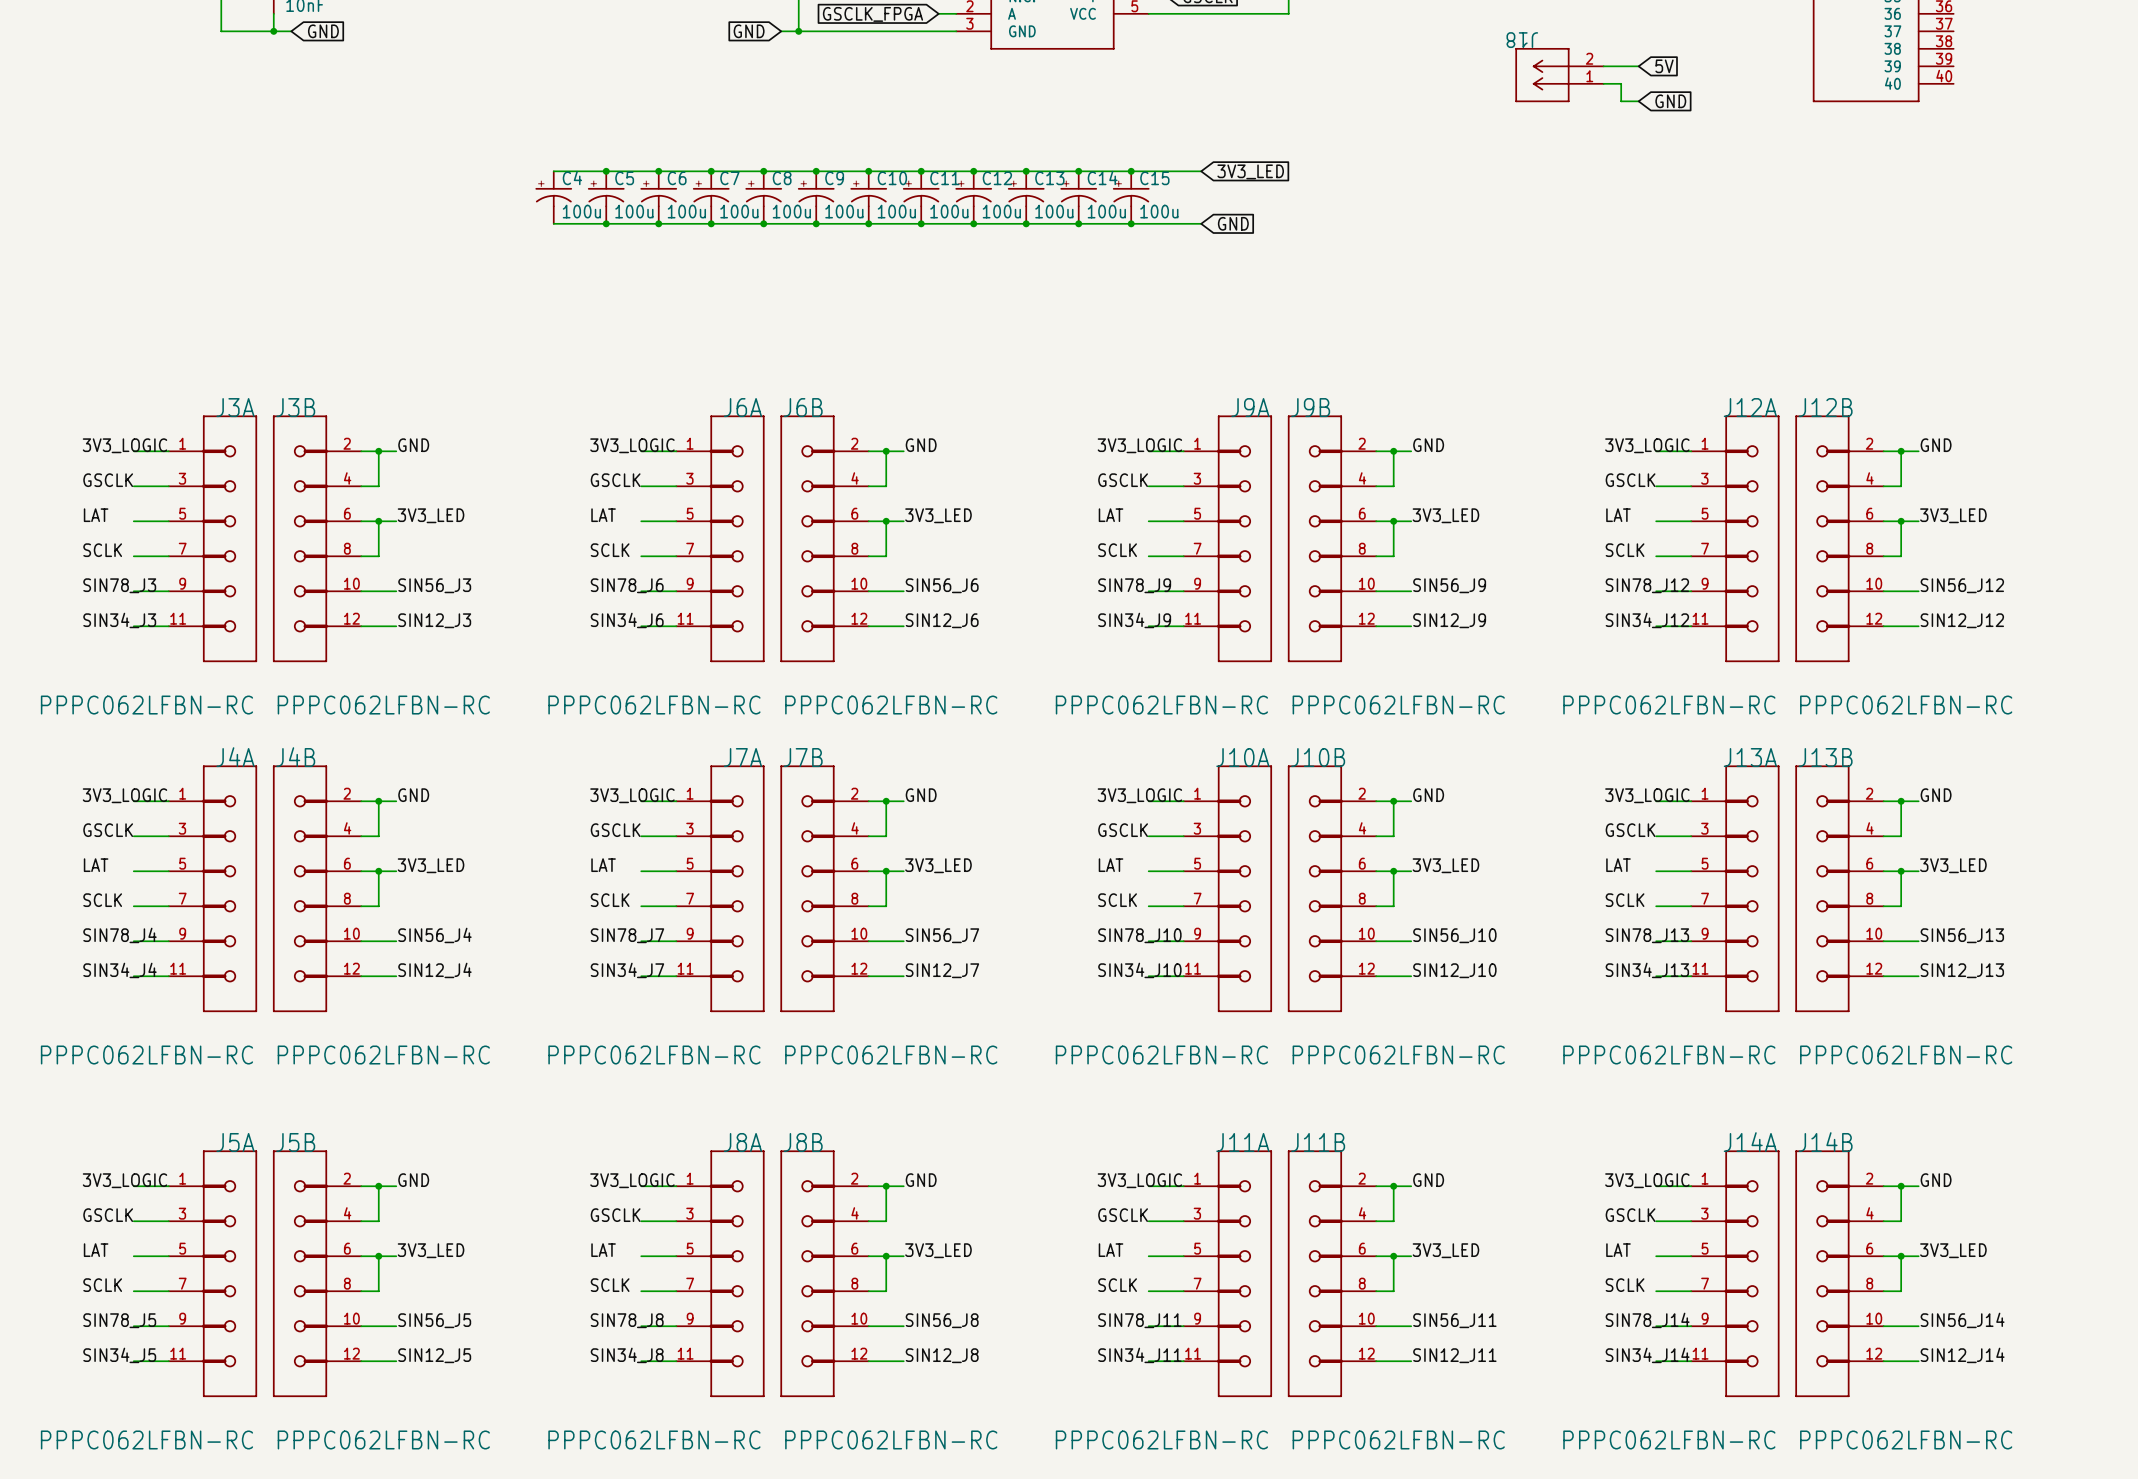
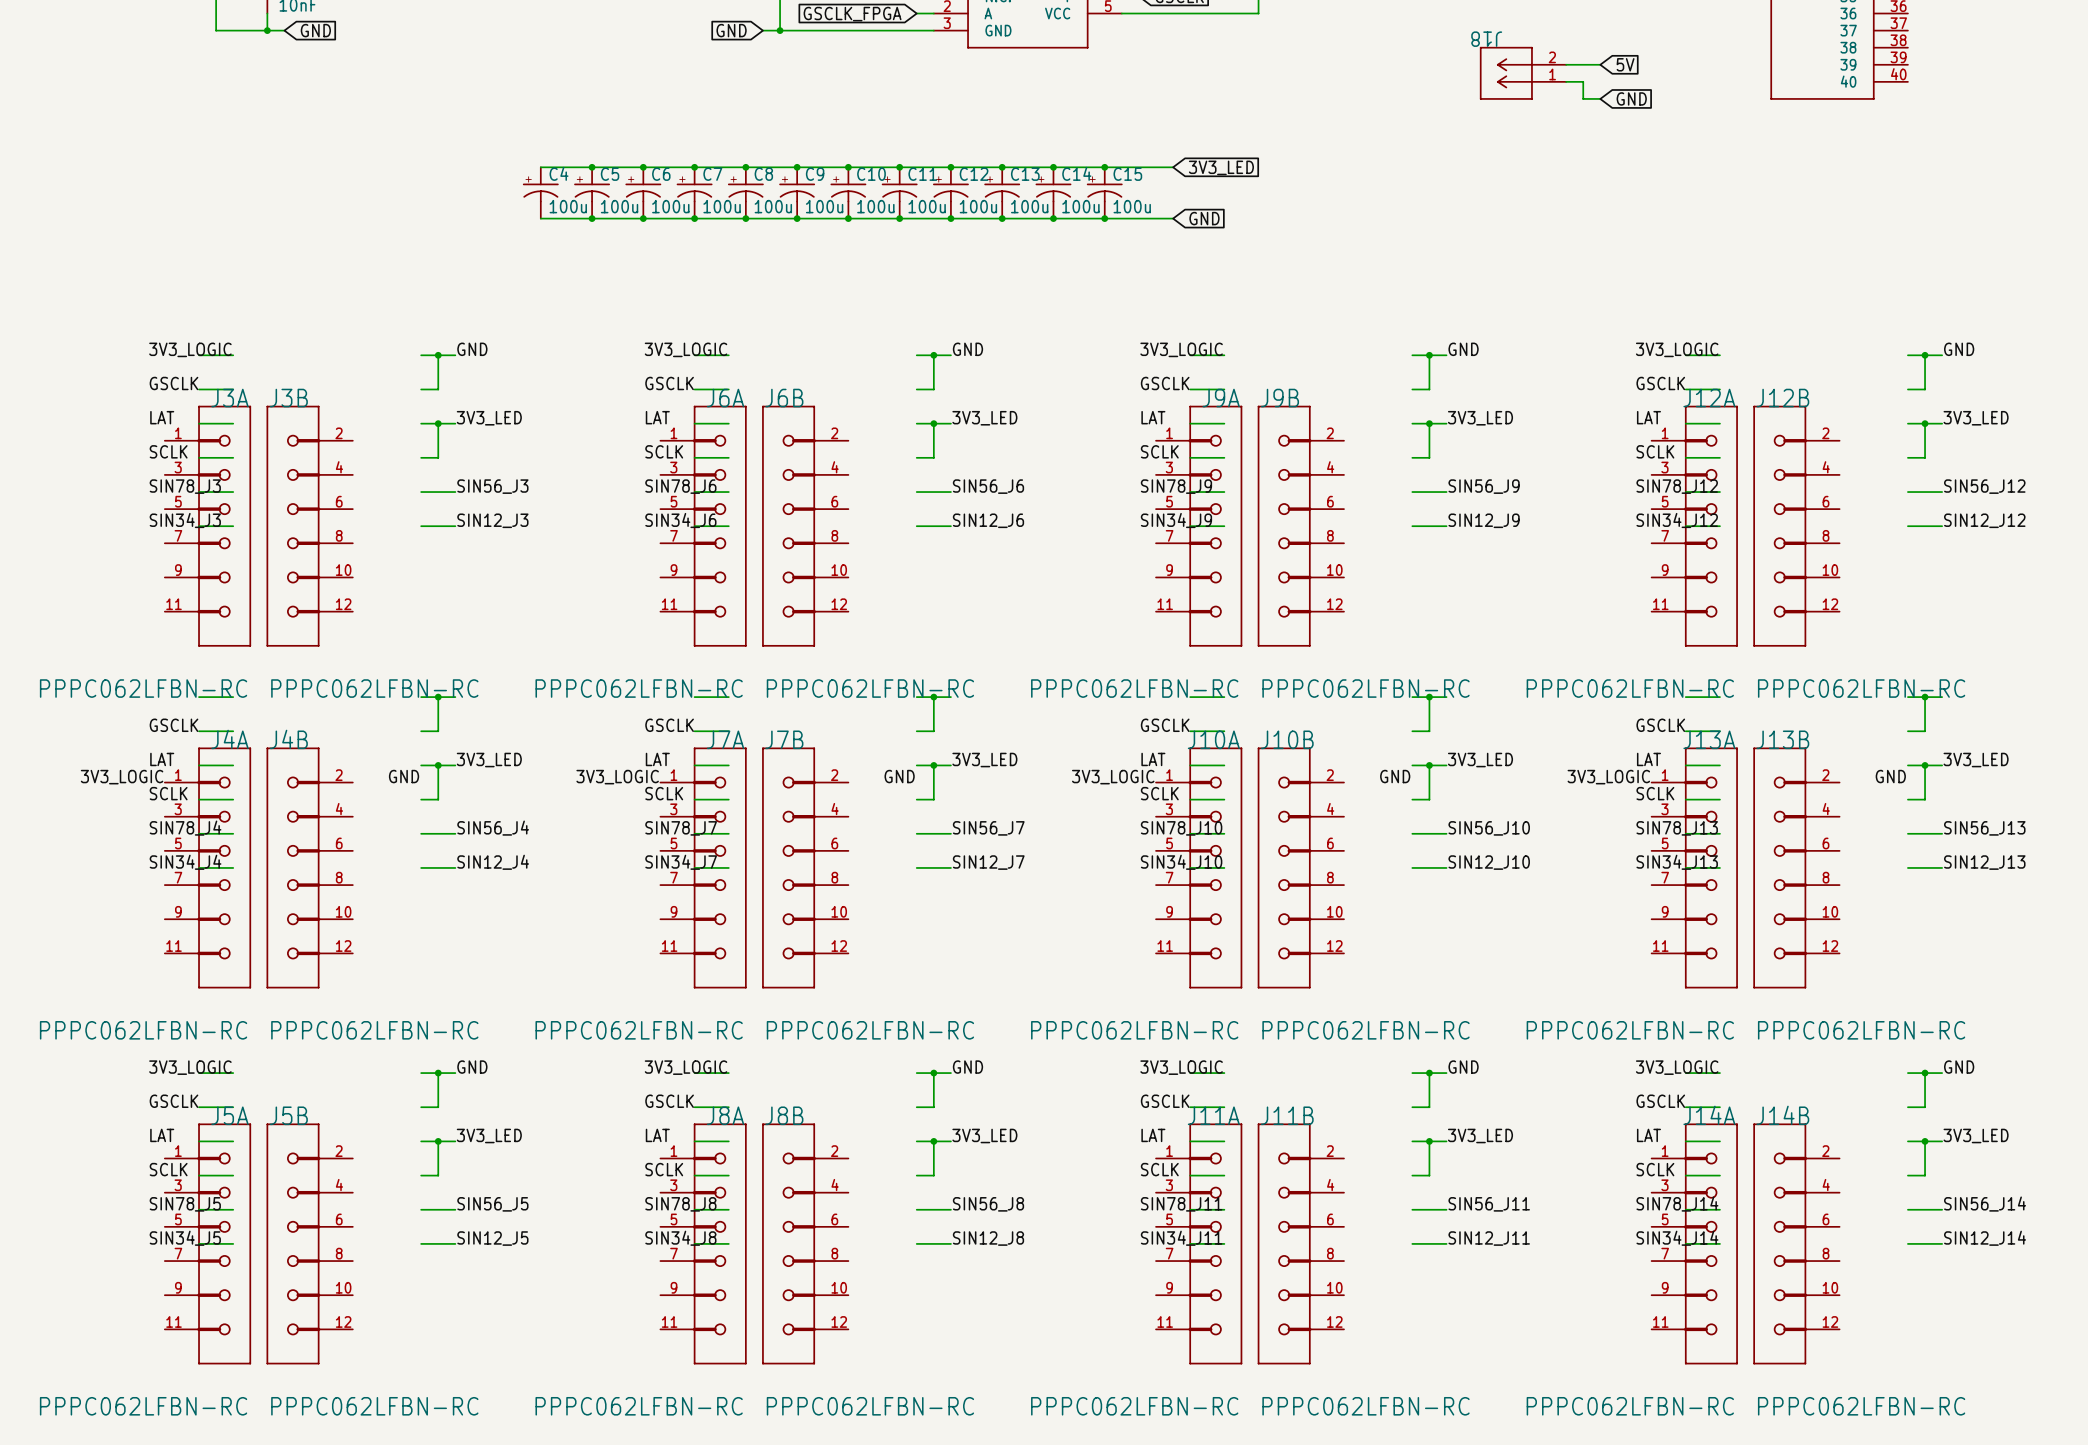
junction: none -> (438, 355)
junction: none -> (933, 355)
junction: none -> (1429, 355)
junction: none -> (1925, 355)
junction: none -> (438, 423)
junction: none -> (933, 423)
junction: none -> (1429, 423)
junction: none -> (1925, 423)
label position: 3V3_LOGIC (124, 445) -> 3V3_LOGIC (190, 349)
label position: GND (413, 445) -> GND (472, 349)
label position: 3V3_LOGIC (632, 445) -> 3V3_LOGIC (686, 349)
label position: GND (921, 445) -> GND (967, 349)
label position: 3V3_LOGIC (1139, 445) -> 3V3_LOGIC (1181, 349)
label position: GND (1428, 445) -> GND (1463, 349)
label position: 3V3_LOGIC (1647, 445) -> 3V3_LOGIC (1677, 349)
label position: GND (1936, 445) -> GND (1959, 349)
wire: (133, 451) (168, 451) -> (199, 355) (233, 355)
wire: (361, 451) (396, 451) -> (421, 355) (455, 355)
wire: (378, 451) (378, 486) (361, 486) -> (438, 355) (438, 389) (421, 389)
junction: (378, 451) -> none
wire: (641, 451) (676, 451) -> (694, 355) (728, 355)
wire: (868, 451) (903, 451) -> (916, 355) (950, 355)
wire: (886, 451) (886, 486) (868, 486) -> (933, 355) (933, 389) (916, 389)
junction: (886, 451) -> none
wire: (1148, 451) (1183, 451) -> (1190, 355) (1224, 355)
wire: (1376, 451) (1411, 451) -> (1412, 355) (1446, 355)
wire: (1393, 451) (1393, 486) (1376, 486) -> (1429, 355) (1429, 389) (1412, 389)
junction: (1393, 451) -> none
wire: (1656, 451) (1691, 451) -> (1685, 355) (1719, 355)
wire: (1883, 451) (1918, 451) -> (1907, 355) (1942, 355)
wire: (1901, 451) (1901, 486) (1883, 486) -> (1925, 355) (1925, 389) (1907, 389)
junction: (1901, 451) -> none
label position: GSCLK (108, 480) -> GSCLK (174, 383)
label position: GSCLK (615, 480) -> GSCLK (669, 383)
label position: GSCLK (1123, 480) -> GSCLK (1165, 383)
label position: GSCLK (1630, 480) -> GSCLK (1660, 383)
wire: (133, 486) (168, 486) -> (199, 389) (233, 389)
wire: (641, 486) (676, 486) -> (694, 389) (728, 389)
wire: (1148, 486) (1183, 486) -> (1190, 389) (1224, 389)
wire: (1656, 486) (1691, 486) -> (1685, 389) (1719, 389)
label position: LAT (96, 515) -> LAT (162, 417)
label position: 3V3_LED (431, 515) -> 3V3_LED (489, 418)
label position: LAT (603, 515) -> LAT (657, 417)
label position: 3V3_LED (938, 515) -> 3V3_LED (984, 418)
label position: LAT (1111, 515) -> LAT (1153, 417)
label position: 3V3_LED (1445, 515) -> 3V3_LED (1480, 418)
label position: LAT (1618, 515) -> LAT (1648, 417)
label position: 3V3_LED (1953, 515) -> 3V3_LED (1976, 418)
wire: (133, 521) (168, 521) -> (199, 423) (233, 423)
wire: (361, 521) (396, 521) -> (421, 423) (455, 423)
wire: (378, 521) (378, 556) (361, 556) -> (438, 423) (438, 457) (421, 457)
junction: (378, 521) -> none
wire: (641, 521) (676, 521) -> (694, 423) (728, 423)
wire: (868, 521) (903, 521) -> (916, 423) (950, 423)
wire: (886, 521) (886, 556) (868, 556) -> (933, 423) (933, 457) (916, 457)
junction: (886, 521) -> none
wire: (1148, 521) (1183, 521) -> (1190, 423) (1224, 423)
wire: (1376, 521) (1411, 521) -> (1412, 423) (1446, 423)
wire: (1393, 521) (1393, 556) (1376, 556) -> (1429, 423) (1429, 457) (1412, 457)
junction: (1393, 521) -> none
wire: (1656, 521) (1691, 521) -> (1685, 423) (1719, 423)
wire: (1883, 521) (1918, 521) -> (1907, 423) (1942, 423)
wire: (1901, 521) (1901, 556) (1883, 556) -> (1925, 423) (1925, 457) (1907, 457)
junction: (1901, 521) -> none
label position: SCLK (102, 550) -> SCLK (168, 451)
label position: SCLK (610, 550) -> SCLK (664, 451)
label position: SCLK (1117, 550) -> SCLK (1159, 451)
label position: SCLK (1625, 550) -> SCLK (1655, 451)
wire: (133, 556) (168, 556) -> (199, 457) (233, 457)
wire: (641, 556) (676, 556) -> (694, 457) (728, 457)
wire: (1148, 556) (1183, 556) -> (1190, 457) (1224, 457)
wire: (1656, 556) (1691, 556) -> (1685, 457) (1719, 457)
label position: SIN78_J3 (119, 585) -> SIN78_J3 (185, 486)
label position: SIN56_J3 (434, 585) -> SIN56_J3 (492, 486)
label position: SIN78_J6 (627, 585) -> SIN78_J6 (680, 486)
label position: SIN56_J6 (942, 585) -> SIN56_J6 (988, 486)
label position: SIN78_J9 (1134, 585) -> SIN78_J9 (1176, 486)
label position: SIN56_J9 (1449, 585) -> SIN56_J9 (1484, 486)
label position: SIN78_J12 (1647, 585) -> SIN78_J12 (1677, 486)
label position: SIN56_J12 (1962, 585) -> SIN56_J12 (1984, 486)
wire: (133, 591) (168, 591) -> (199, 492) (233, 492)
wire: (361, 591) (396, 591) -> (421, 492) (455, 492)
wire: (641, 591) (676, 591) -> (694, 492) (728, 492)
wire: (868, 591) (903, 591) -> (916, 492) (950, 492)
wire: (1148, 591) (1183, 591) -> (1190, 492) (1224, 492)
wire: (1376, 591) (1411, 591) -> (1412, 492) (1446, 492)
wire: (1656, 591) (1691, 591) -> (1685, 492) (1719, 492)
wire: (1883, 591) (1918, 591) -> (1907, 492) (1942, 492)
label position: SIN34_J3 (119, 620) -> SIN34_J3 (185, 520)
label position: SIN12_J3 (434, 620) -> SIN12_J3 (492, 520)
label position: SIN34_J6 (627, 620) -> SIN34_J6 (680, 520)
label position: SIN12_J6 (942, 620) -> SIN12_J6 (988, 520)
label position: SIN34_J9 (1134, 620) -> SIN34_J9 (1176, 520)
label position: SIN12_J9 (1449, 620) -> SIN12_J9 (1484, 520)
label position: SIN34_J12 (1647, 620) -> SIN34_J12 (1677, 520)
label position: SIN12_J12 (1962, 620) -> SIN12_J12 (1984, 520)
wire: (133, 626) (168, 626) -> (199, 526) (233, 526)
wire: (361, 626) (396, 626) -> (421, 526) (455, 526)
wire: (641, 626) (676, 626) -> (694, 526) (728, 526)
wire: (868, 626) (903, 626) -> (916, 526) (950, 526)
wire: (1148, 626) (1183, 626) -> (1190, 526) (1224, 526)
wire: (1376, 626) (1411, 626) -> (1412, 526) (1446, 526)
wire: (1656, 626) (1691, 626) -> (1685, 526) (1719, 526)
wire: (1883, 626) (1918, 626) -> (1907, 526) (1942, 526)
junction: none -> (438, 697)
junction: none -> (933, 697)
junction: none -> (1429, 697)
junction: none -> (1925, 697)
junction: none -> (438, 765)
junction: none -> (933, 765)
junction: none -> (1429, 765)
junction: none -> (1925, 765)
wire: (133, 801) (168, 801) -> (199, 697) (233, 697)
wire: (361, 801) (396, 801) -> (421, 697) (455, 697)
wire: (378, 801) (378, 836) (361, 836) -> (438, 697) (438, 731) (421, 731)
junction: (378, 801) -> none
wire: (641, 801) (676, 801) -> (694, 697) (728, 697)
wire: (868, 801) (903, 801) -> (916, 697) (950, 697)
wire: (886, 801) (886, 836) (868, 836) -> (933, 697) (933, 731) (916, 731)
junction: (886, 801) -> none
wire: (1148, 801) (1183, 801) -> (1190, 697) (1224, 697)
wire: (1376, 801) (1411, 801) -> (1412, 697) (1446, 697)
wire: (1393, 801) (1393, 836) (1376, 836) -> (1429, 697) (1429, 731) (1412, 731)
junction: (1393, 801) -> none
wire: (1656, 801) (1691, 801) -> (1685, 697) (1719, 697)
wire: (1883, 801) (1918, 801) -> (1907, 697) (1942, 697)
wire: (1901, 801) (1901, 836) (1883, 836) -> (1925, 697) (1925, 731) (1907, 731)
junction: (1901, 801) -> none
label position: GSCLK (108, 830) -> GSCLK (174, 725)
label position: GSCLK (615, 830) -> GSCLK (669, 725)
label position: GSCLK (1123, 830) -> GSCLK (1165, 725)
label position: GSCLK (1630, 830) -> GSCLK (1660, 725)
wire: (133, 836) (168, 836) -> (199, 731) (233, 731)
wire: (641, 836) (676, 836) -> (694, 731) (728, 731)
wire: (1148, 836) (1183, 836) -> (1190, 731) (1224, 731)
wire: (1656, 836) (1691, 836) -> (1685, 731) (1719, 731)
label position: LAT (96, 865) -> LAT (162, 759)
label position: 3V3_LED (431, 865) -> 3V3_LED (489, 760)
label position: LAT (603, 865) -> LAT (657, 759)
label position: 3V3_LED (938, 865) -> 3V3_LED (984, 760)
label position: LAT (1111, 865) -> LAT (1153, 759)
label position: 3V3_LED (1445, 865) -> 3V3_LED (1480, 760)
label position: LAT (1618, 865) -> LAT (1648, 759)
label position: 3V3_LED (1953, 865) -> 3V3_LED (1976, 760)
wire: (133, 871) (168, 871) -> (199, 765) (233, 765)
wire: (361, 871) (396, 871) -> (421, 765) (455, 765)
wire: (378, 871) (378, 906) (361, 906) -> (438, 765) (438, 799) (421, 799)
junction: (378, 871) -> none
wire: (641, 871) (676, 871) -> (694, 765) (728, 765)
wire: (868, 871) (903, 871) -> (916, 765) (950, 765)
wire: (886, 871) (886, 906) (868, 906) -> (933, 765) (933, 799) (916, 799)
junction: (886, 871) -> none
wire: (1148, 871) (1183, 871) -> (1190, 765) (1224, 765)
wire: (1376, 871) (1411, 871) -> (1412, 765) (1446, 765)
wire: (1393, 871) (1393, 906) (1376, 906) -> (1429, 765) (1429, 799) (1412, 799)
junction: (1393, 871) -> none
wire: (1656, 871) (1691, 871) -> (1685, 765) (1719, 765)
wire: (1883, 871) (1918, 871) -> (1907, 765) (1942, 765)
wire: (1901, 871) (1901, 906) (1883, 906) -> (1925, 765) (1925, 799) (1907, 799)
junction: (1901, 871) -> none
label position: SCLK (102, 900) -> SCLK (168, 793)
label position: SCLK (610, 900) -> SCLK (664, 793)
label position: SCLK (1117, 900) -> SCLK (1159, 793)
label position: SCLK (1625, 900) -> SCLK (1655, 793)
wire: (133, 906) (168, 906) -> (199, 799) (233, 799)
wire: (641, 906) (676, 906) -> (694, 799) (728, 799)
wire: (1148, 906) (1183, 906) -> (1190, 799) (1224, 799)
wire: (1656, 906) (1691, 906) -> (1685, 799) (1719, 799)
label position: SIN78_J4 (119, 935) -> SIN78_J4 (185, 828)
label position: SIN56_J4 (434, 935) -> SIN56_J4 (493, 828)
label position: SIN78_J7 (627, 935) -> SIN78_J7 (681, 828)
label position: SIN56_J7 (942, 935) -> SIN56_J7 (988, 828)
label position: SIN78_J10 (1139, 935) -> SIN78_J10 (1181, 828)
label position: SIN56_J10 (1454, 935) -> SIN56_J10 (1489, 828)
label position: SIN78_J13 (1647, 935) -> SIN78_J13 (1677, 828)
label position: SIN56_J13 (1962, 935) -> SIN56_J13 (1984, 828)
wire: (133, 941) (168, 941) -> (199, 833) (233, 833)
wire: (361, 941) (396, 941) -> (421, 833) (455, 833)
wire: (641, 941) (676, 941) -> (694, 833) (728, 833)
wire: (868, 941) (903, 941) -> (916, 833) (950, 833)
wire: (1148, 941) (1183, 941) -> (1190, 833) (1224, 833)
wire: (1376, 941) (1411, 941) -> (1412, 833) (1446, 833)
wire: (1656, 941) (1691, 941) -> (1685, 833) (1719, 833)
wire: (1883, 941) (1918, 941) -> (1907, 833) (1942, 833)
label position: SIN34_J4 (119, 970) -> SIN34_J4 (185, 862)
label position: SIN12_J4 (434, 970) -> SIN12_J4 (493, 862)
label position: SIN34_J7 (627, 970) -> SIN34_J7 (681, 862)
label position: SIN12_J7 (942, 970) -> SIN12_J7 (988, 862)
label position: SIN34_J10 (1139, 970) -> SIN34_J10 (1181, 862)
label position: SIN12_J10 (1454, 970) -> SIN12_J10 (1489, 862)
label position: SIN34_J13 (1647, 970) -> SIN34_J13 (1677, 862)
label position: SIN12_J13 (1962, 970) -> SIN12_J13 (1984, 862)
wire: (133, 976) (168, 976) -> (199, 867) (233, 867)
wire: (361, 976) (396, 976) -> (421, 867) (455, 867)
wire: (641, 976) (676, 976) -> (694, 867) (728, 867)
wire: (868, 976) (903, 976) -> (916, 867) (950, 867)
wire: (1148, 976) (1183, 976) -> (1190, 867) (1224, 867)
wire: (1376, 976) (1411, 976) -> (1412, 867) (1446, 867)
wire: (1656, 976) (1691, 976) -> (1685, 867) (1719, 867)
wire: (1883, 976) (1918, 976) -> (1907, 867) (1942, 867)
junction: none -> (438, 1073)
junction: none -> (933, 1073)
junction: none -> (1429, 1073)
junction: none -> (1925, 1073)
junction: none -> (438, 1141)
junction: none -> (933, 1141)
junction: none -> (1429, 1141)
junction: none -> (1925, 1141)
label position: 3V3_LOGIC (124, 1180) -> 3V3_LOGIC (190, 1067)
label position: GND (413, 1180) -> GND (472, 1067)
label position: 3V3_LOGIC (632, 1180) -> 3V3_LOGIC (686, 1067)
label position: GND (921, 1180) -> GND (967, 1067)
label position: 3V3_LOGIC (1139, 1180) -> 3V3_LOGIC (1181, 1067)
label position: GND (1428, 1180) -> GND (1463, 1067)
label position: 3V3_LOGIC (1647, 1180) -> 3V3_LOGIC (1677, 1067)
label position: GND (1936, 1180) -> GND (1959, 1067)
wire: (133, 1186) (168, 1186) -> (199, 1073) (233, 1073)
wire: (361, 1186) (396, 1186) -> (421, 1073) (455, 1073)
wire: (378, 1186) (378, 1221) (361, 1221) -> (438, 1073) (438, 1107) (421, 1107)
junction: (378, 1186) -> none
wire: (641, 1186) (676, 1186) -> (694, 1073) (728, 1073)
wire: (868, 1186) (903, 1186) -> (916, 1073) (950, 1073)
wire: (886, 1186) (886, 1221) (868, 1221) -> (933, 1073) (933, 1107) (916, 1107)
junction: (886, 1186) -> none
wire: (1148, 1186) (1183, 1186) -> (1190, 1073) (1224, 1073)
wire: (1376, 1186) (1411, 1186) -> (1412, 1073) (1446, 1073)
wire: (1393, 1186) (1393, 1221) (1376, 1221) -> (1429, 1073) (1429, 1107) (1412, 1107)
junction: (1393, 1186) -> none
wire: (1656, 1186) (1691, 1186) -> (1685, 1073) (1719, 1073)
wire: (1883, 1186) (1918, 1186) -> (1907, 1073) (1942, 1073)
wire: (1901, 1186) (1901, 1221) (1883, 1221) -> (1925, 1073) (1925, 1107) (1907, 1107)
junction: (1901, 1186) -> none
label position: GSCLK (108, 1215) -> GSCLK (174, 1101)
label position: GSCLK (615, 1215) -> GSCLK (669, 1101)
label position: GSCLK (1123, 1215) -> GSCLK (1165, 1101)
label position: GSCLK (1630, 1215) -> GSCLK (1660, 1101)
wire: (133, 1221) (168, 1221) -> (199, 1107) (233, 1107)
wire: (641, 1221) (676, 1221) -> (694, 1107) (728, 1107)
wire: (1148, 1221) (1183, 1221) -> (1190, 1107) (1224, 1107)
wire: (1656, 1221) (1691, 1221) -> (1685, 1107) (1719, 1107)
label position: LAT (96, 1250) -> LAT (162, 1135)
label position: 3V3_LED (431, 1250) -> 3V3_LED (489, 1135)
label position: LAT (603, 1250) -> LAT (657, 1135)
label position: 3V3_LED (938, 1250) -> 3V3_LED (984, 1135)
label position: LAT (1111, 1250) -> LAT (1153, 1135)
label position: 3V3_LED (1445, 1250) -> 3V3_LED (1480, 1135)
label position: LAT (1618, 1250) -> LAT (1648, 1135)
label position: 3V3_LED (1953, 1250) -> 3V3_LED (1976, 1135)
wire: (133, 1256) (168, 1256) -> (199, 1141) (233, 1141)
wire: (361, 1256) (396, 1256) -> (421, 1141) (455, 1141)
wire: (378, 1256) (378, 1291) (361, 1291) -> (438, 1141) (438, 1175) (421, 1175)
junction: (378, 1256) -> none
wire: (641, 1256) (676, 1256) -> (694, 1141) (728, 1141)
wire: (868, 1256) (903, 1256) -> (916, 1141) (950, 1141)
wire: (886, 1256) (886, 1291) (868, 1291) -> (933, 1141) (933, 1175) (916, 1175)
junction: (886, 1256) -> none
wire: (1148, 1256) (1183, 1256) -> (1190, 1141) (1224, 1141)
wire: (1376, 1256) (1411, 1256) -> (1412, 1141) (1446, 1141)
wire: (1393, 1256) (1393, 1291) (1376, 1291) -> (1429, 1141) (1429, 1175) (1412, 1175)
junction: (1393, 1256) -> none
wire: (1656, 1256) (1691, 1256) -> (1685, 1141) (1719, 1141)
wire: (1883, 1256) (1918, 1256) -> (1907, 1141) (1942, 1141)
wire: (1901, 1256) (1901, 1291) (1883, 1291) -> (1925, 1141) (1925, 1175) (1907, 1175)
junction: (1901, 1256) -> none
label position: SCLK (102, 1285) -> SCLK (168, 1169)
label position: SCLK (610, 1285) -> SCLK (664, 1169)
label position: SCLK (1117, 1285) -> SCLK (1159, 1169)
label position: SCLK (1625, 1285) -> SCLK (1655, 1169)
wire: (133, 1291) (168, 1291) -> (199, 1175) (233, 1175)
wire: (641, 1291) (676, 1291) -> (694, 1175) (728, 1175)
wire: (1148, 1291) (1183, 1291) -> (1190, 1175) (1224, 1175)
wire: (1656, 1291) (1691, 1291) -> (1685, 1175) (1719, 1175)
label position: SIN78_J5 (119, 1320) -> SIN78_J5 (185, 1204)
label position: SIN56_J5 (434, 1320) -> SIN56_J5 (492, 1204)
label position: SIN78_J8 (627, 1320) -> SIN78_J8 (680, 1204)
label position: SIN56_J8 (942, 1320) -> SIN56_J8 (988, 1204)
label position: SIN78_J11 (1139, 1320) -> SIN78_J11 (1181, 1204)
label position: SIN56_J11 (1454, 1320) -> SIN56_J11 (1489, 1204)
label position: SIN78_J14 (1647, 1320) -> SIN78_J14 (1677, 1204)
label position: SIN56_J14 (1962, 1320) -> SIN56_J14 (1985, 1204)
wire: (133, 1326) (168, 1326) -> (199, 1209) (233, 1209)
wire: (361, 1326) (396, 1326) -> (421, 1209) (455, 1209)
wire: (641, 1326) (676, 1326) -> (694, 1209) (728, 1209)
wire: (868, 1326) (903, 1326) -> (916, 1209) (950, 1209)
wire: (1148, 1326) (1183, 1326) -> (1190, 1209) (1224, 1209)
wire: (1376, 1326) (1411, 1326) -> (1412, 1209) (1446, 1209)
wire: (1656, 1326) (1691, 1326) -> (1685, 1209) (1719, 1209)
wire: (1883, 1326) (1918, 1326) -> (1907, 1209) (1942, 1209)
label position: SIN34_J5 (119, 1355) -> SIN34_J5 (185, 1238)
label position: SIN12_J5 (434, 1355) -> SIN12_J5 (492, 1238)
label position: SIN34_J8 (627, 1355) -> SIN34_J8 (680, 1238)
label position: SIN12_J8 (942, 1355) -> SIN12_J8 (988, 1238)
label position: SIN34_J11 (1139, 1355) -> SIN34_J11 (1181, 1238)
label position: SIN12_J11 (1454, 1355) -> SIN12_J11 (1489, 1238)
label position: SIN34_J14 (1647, 1355) -> SIN34_J14 (1677, 1238)
label position: SIN12_J14 (1962, 1355) -> SIN12_J14 (1985, 1238)
wire: (133, 1361) (168, 1361) -> (199, 1243) (233, 1243)
wire: (361, 1361) (396, 1361) -> (421, 1243) (455, 1243)
wire: (641, 1361) (676, 1361) -> (694, 1243) (728, 1243)
wire: (868, 1361) (903, 1361) -> (916, 1243) (950, 1243)
wire: (1148, 1361) (1183, 1361) -> (1190, 1243) (1224, 1243)
wire: (1376, 1361) (1411, 1361) -> (1412, 1243) (1446, 1243)
wire: (1656, 1361) (1691, 1361) -> (1685, 1243) (1719, 1243)
wire: (1883, 1361) (1918, 1361) -> (1907, 1243) (1942, 1243)

